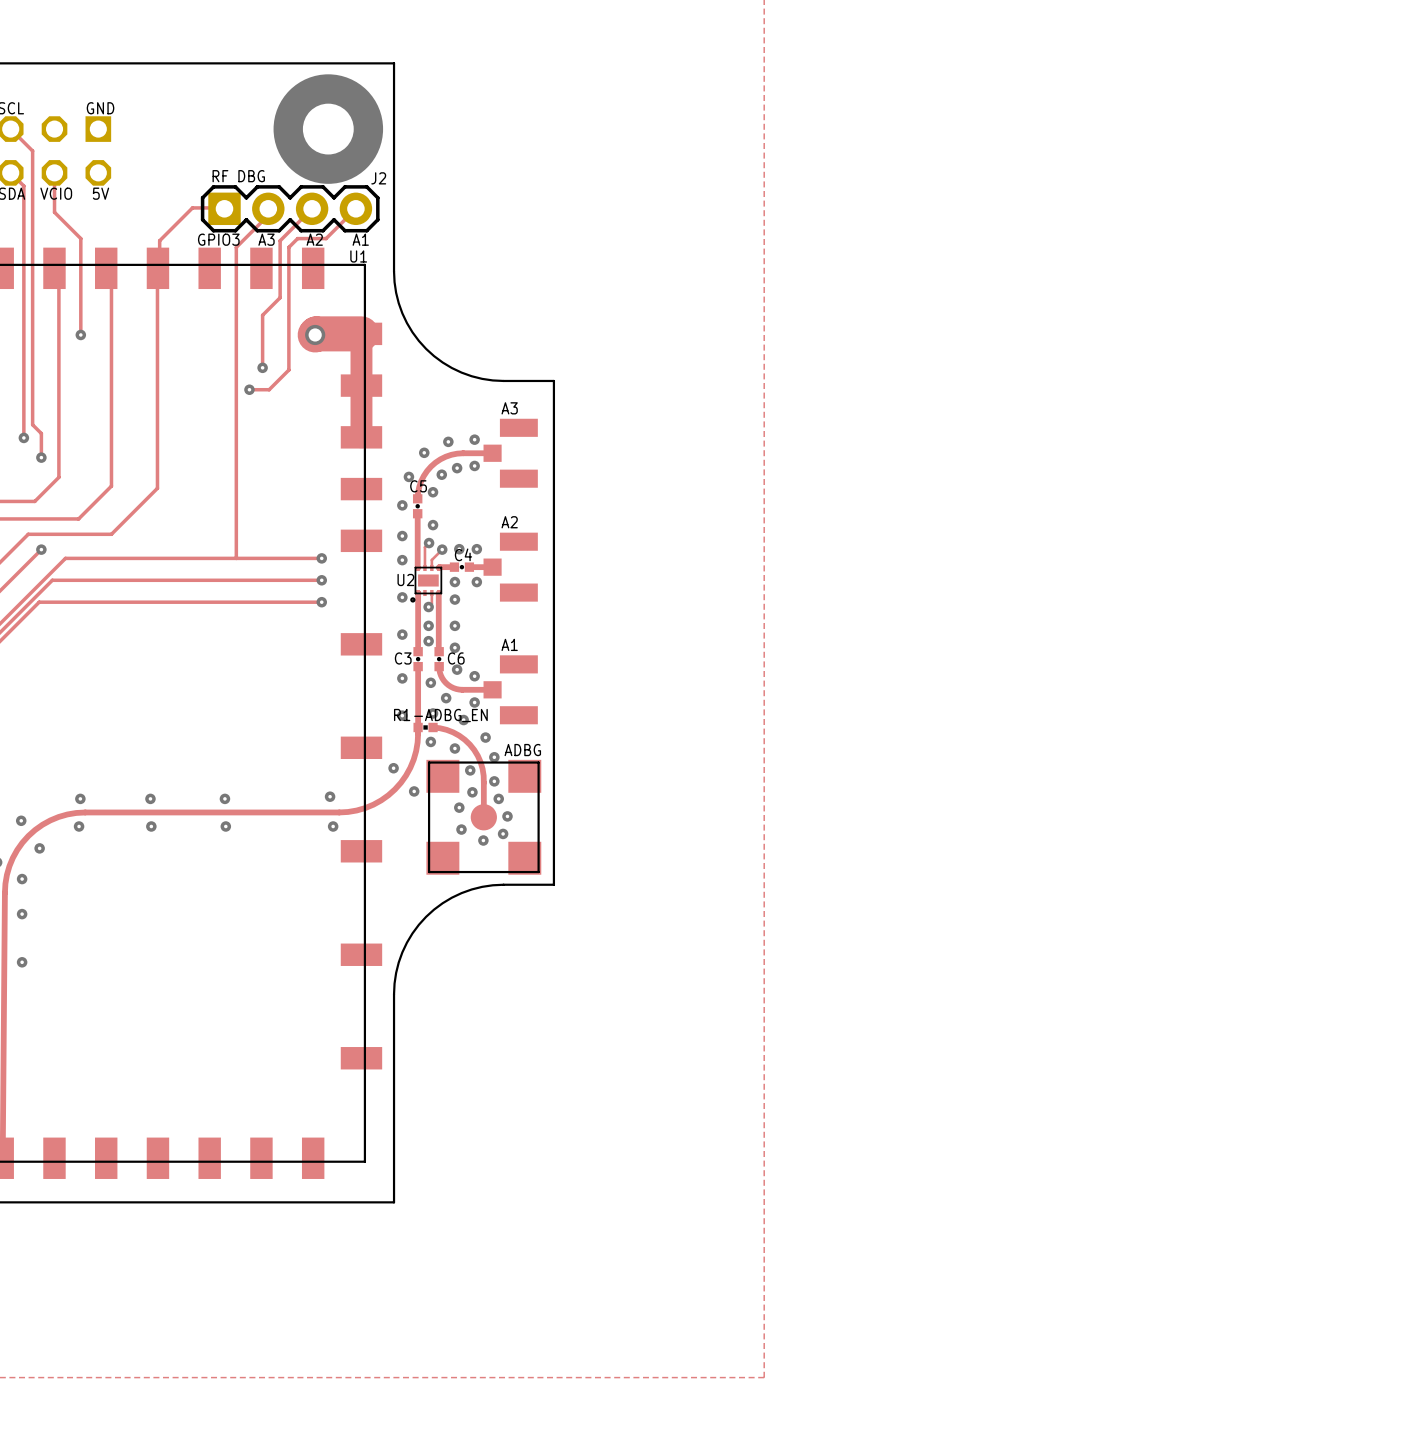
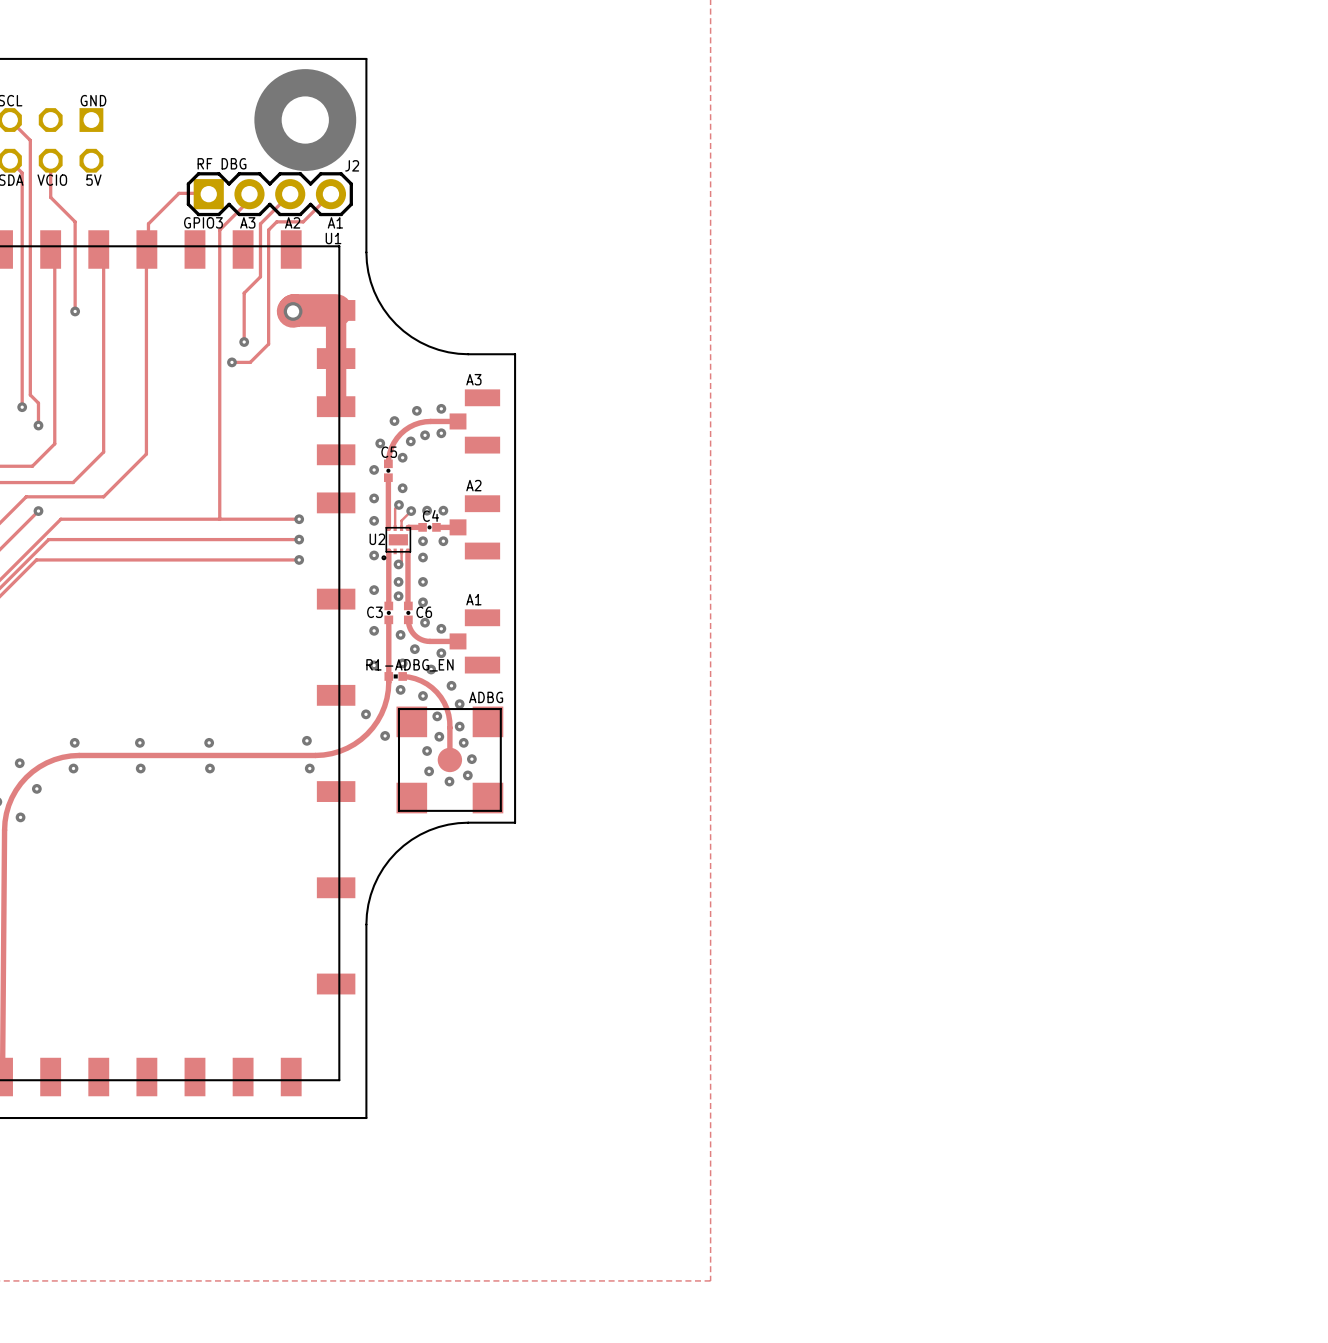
via: (22, 914) -> none
via: (22, 962) -> none

